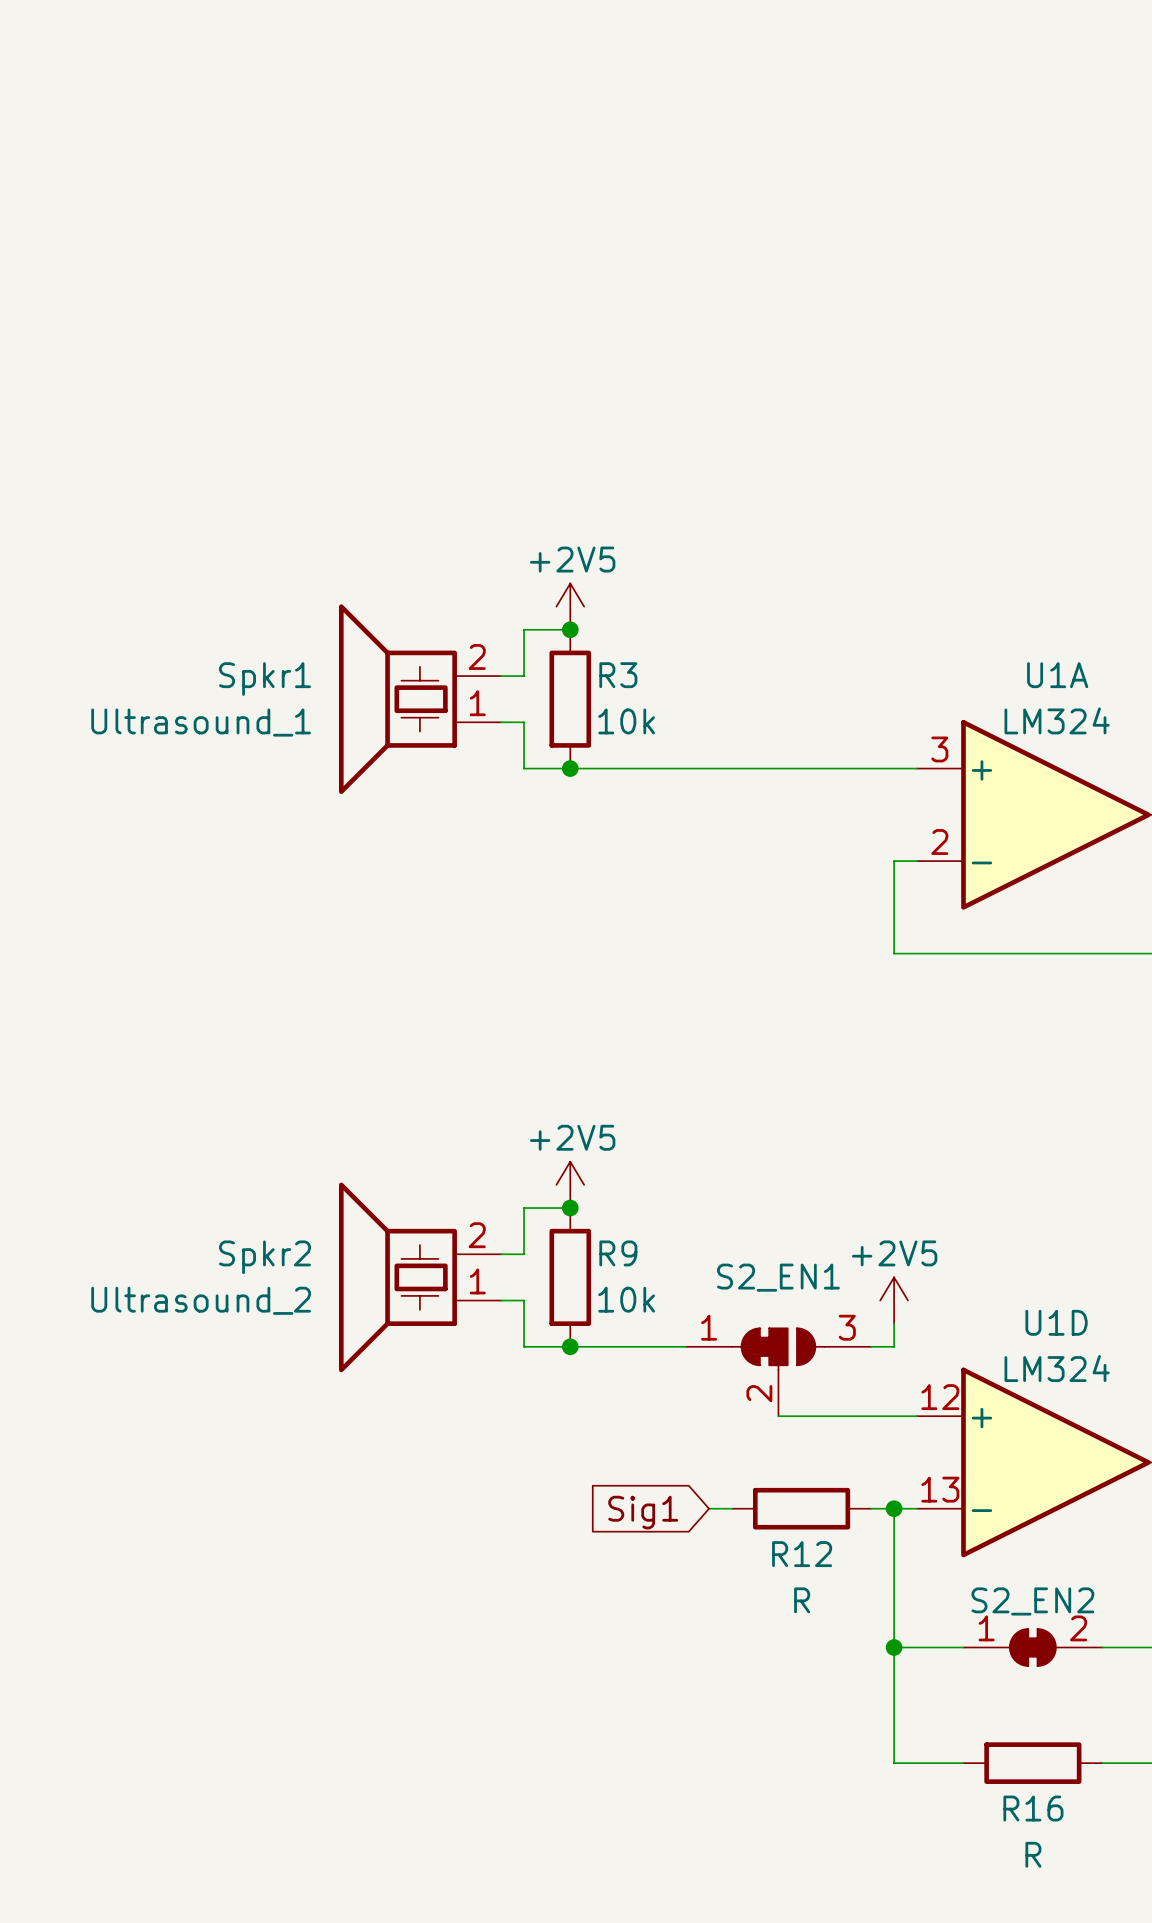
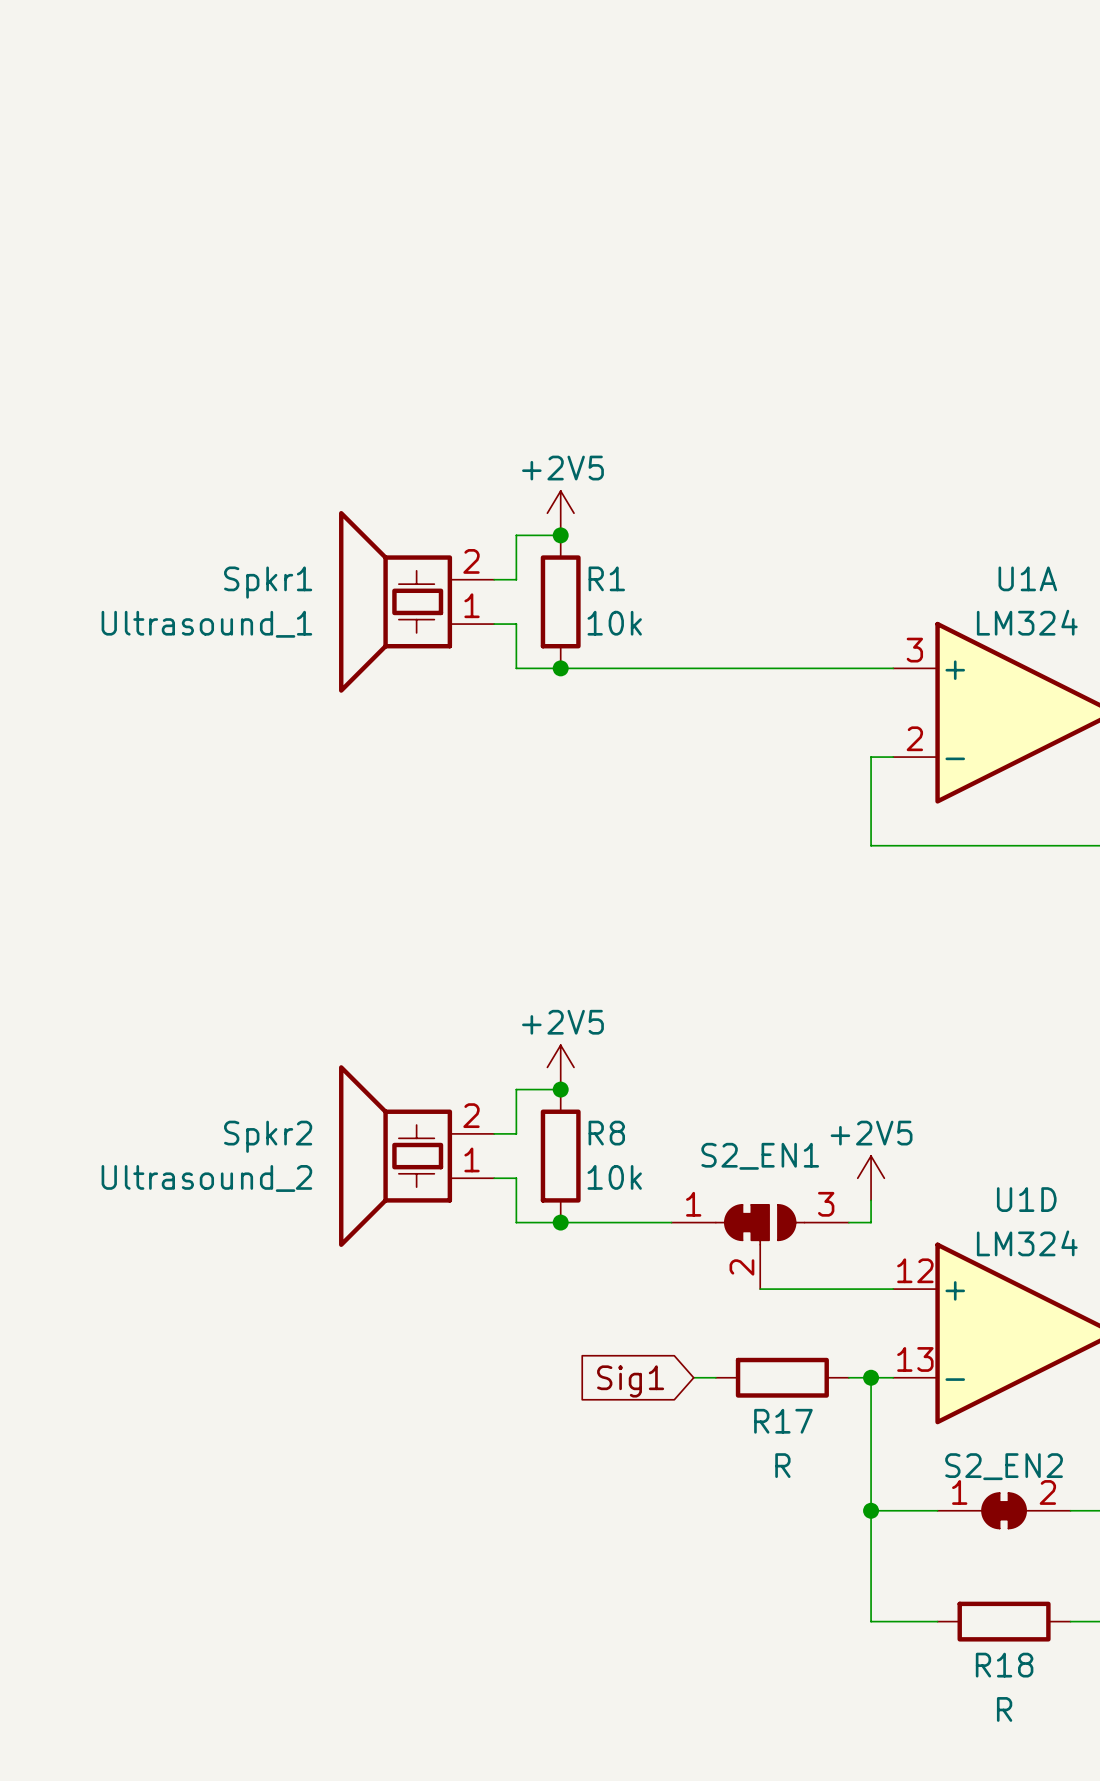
R3 name: R3 (618, 675) -> R1 (606, 578)
R9 name: R9 (618, 1253) -> R8 (606, 1133)
R12 name: R12 (802, 1554) -> R17 (783, 1421)
R16 name: R16 (1033, 1808) -> R18 (1004, 1665)

